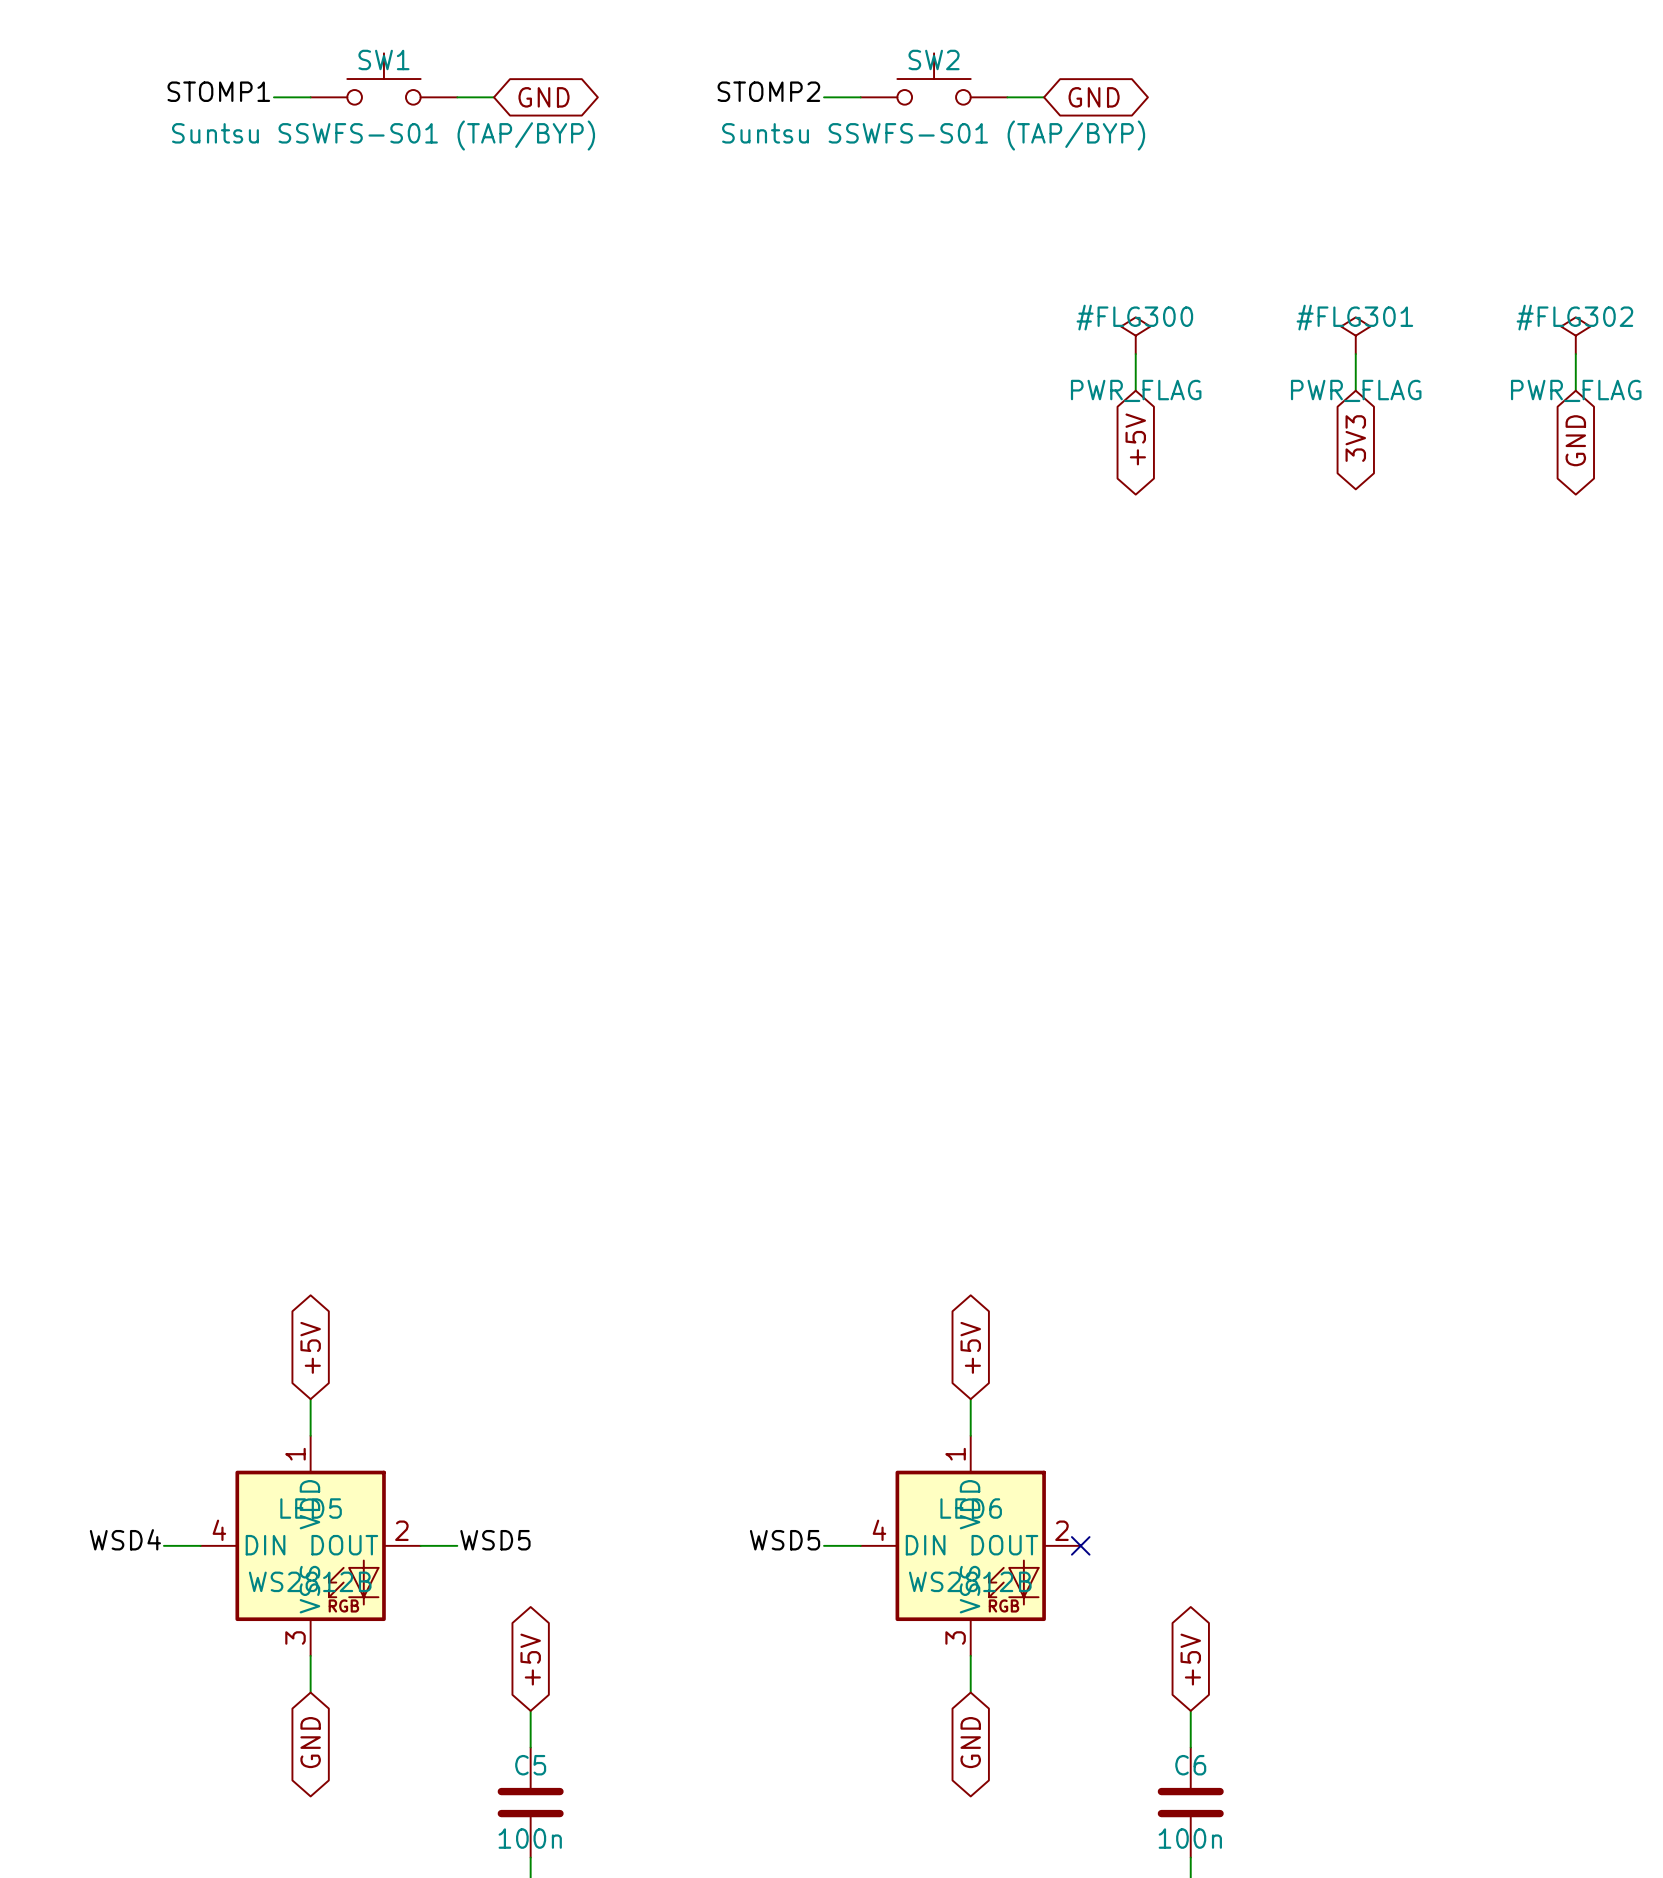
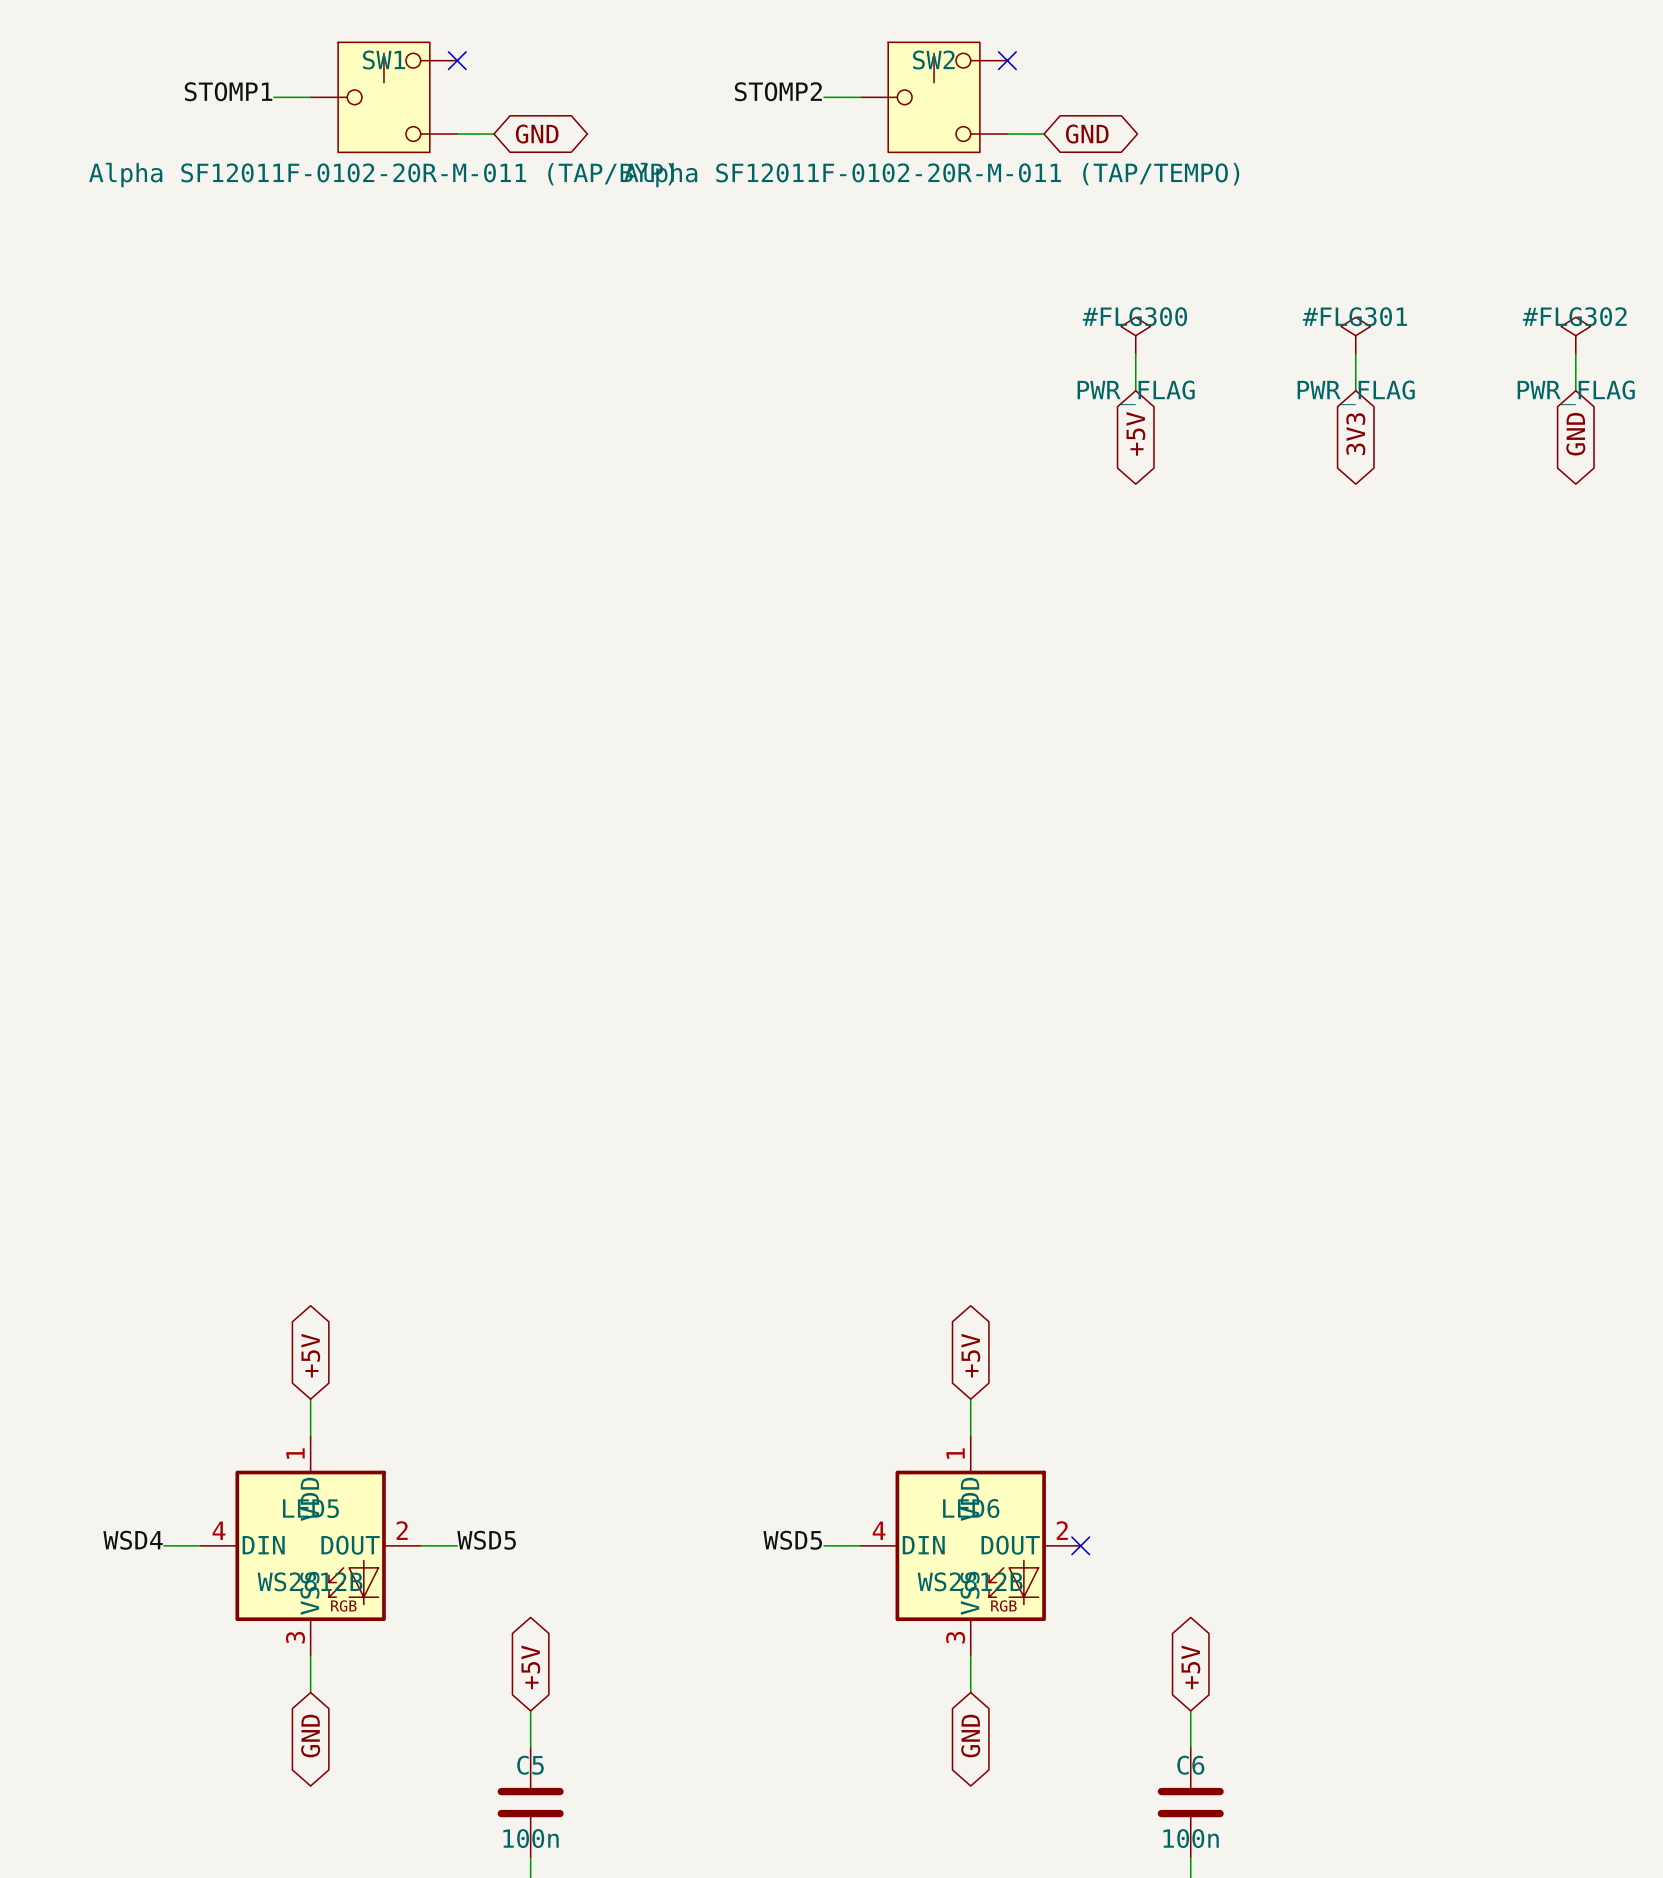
SW1 symbol: [310, 53, 458, 105] -> [310, 42, 458, 153]
SW2 symbol: [860, 53, 1008, 105] -> [860, 42, 1008, 153]
no-connect mark: none -> (457, 60)
no-connect mark: none -> (1007, 60)
wire: (457, 97) (493, 97) -> (457, 134) (493, 134)
global label position: GND (544, 97) -> GND (537, 134)
wire: (1007, 97) (1044, 97) -> (1007, 134) (1044, 134)
global label position: GND (1094, 97) -> GND (1087, 134)
SW1 value: Suntsu SSWFS-S01 (TAP/BYP) (383, 135) -> Alpha SF12011F-0102-20R-M-011 (TAP/BYP) (381, 175)
SW2 value: Suntsu SSWFS-S01 (TAP/BYP) (933, 135) -> Alpha SF12011F-0102-20R-M-011 (TAP/TEMPO) (931, 175)

